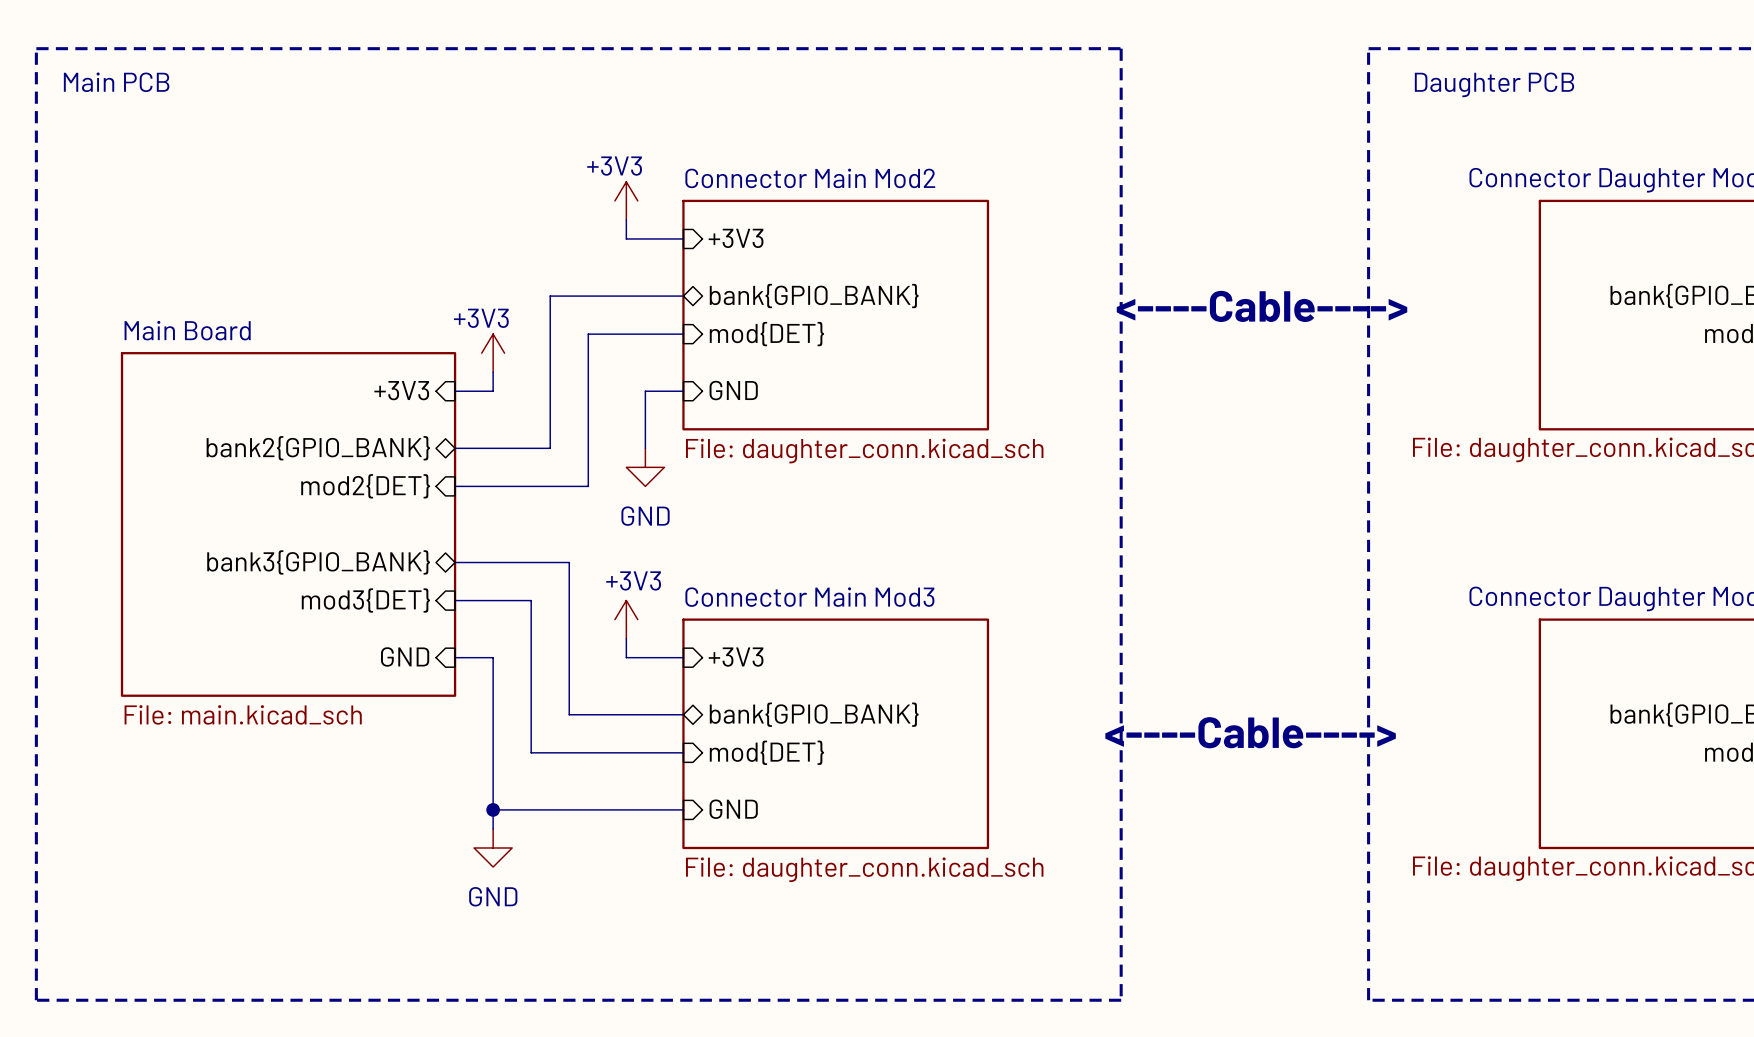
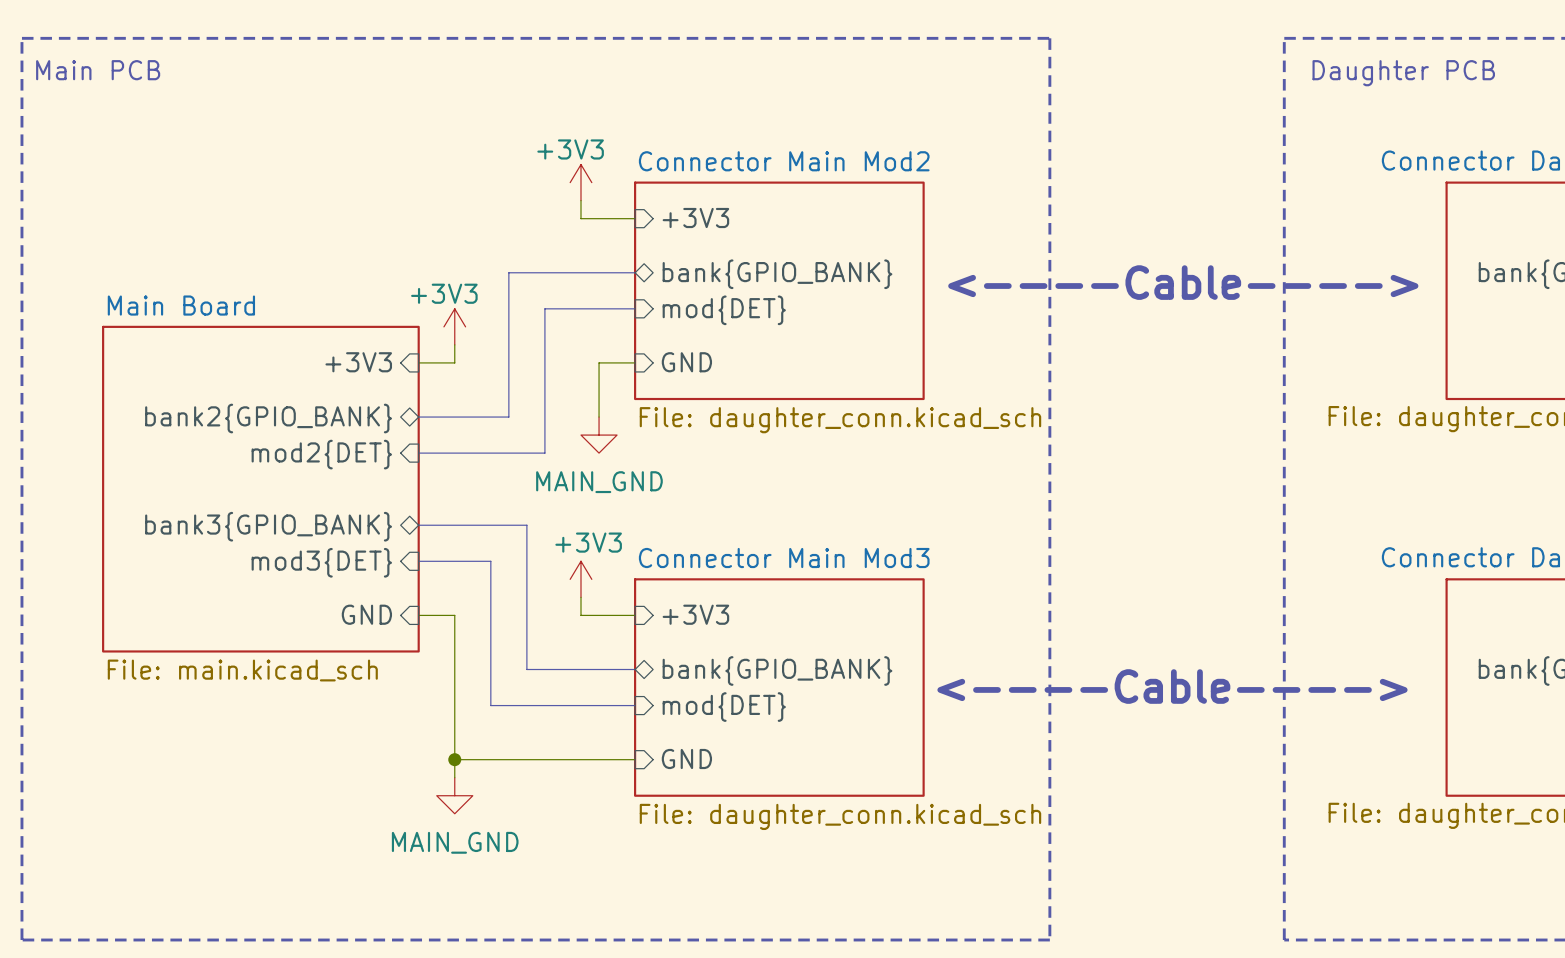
power symbol: GND (645, 467) -> MAIN_GND (599, 435)
power symbol: GND (493, 847) -> MAIN_GND (454, 795)

